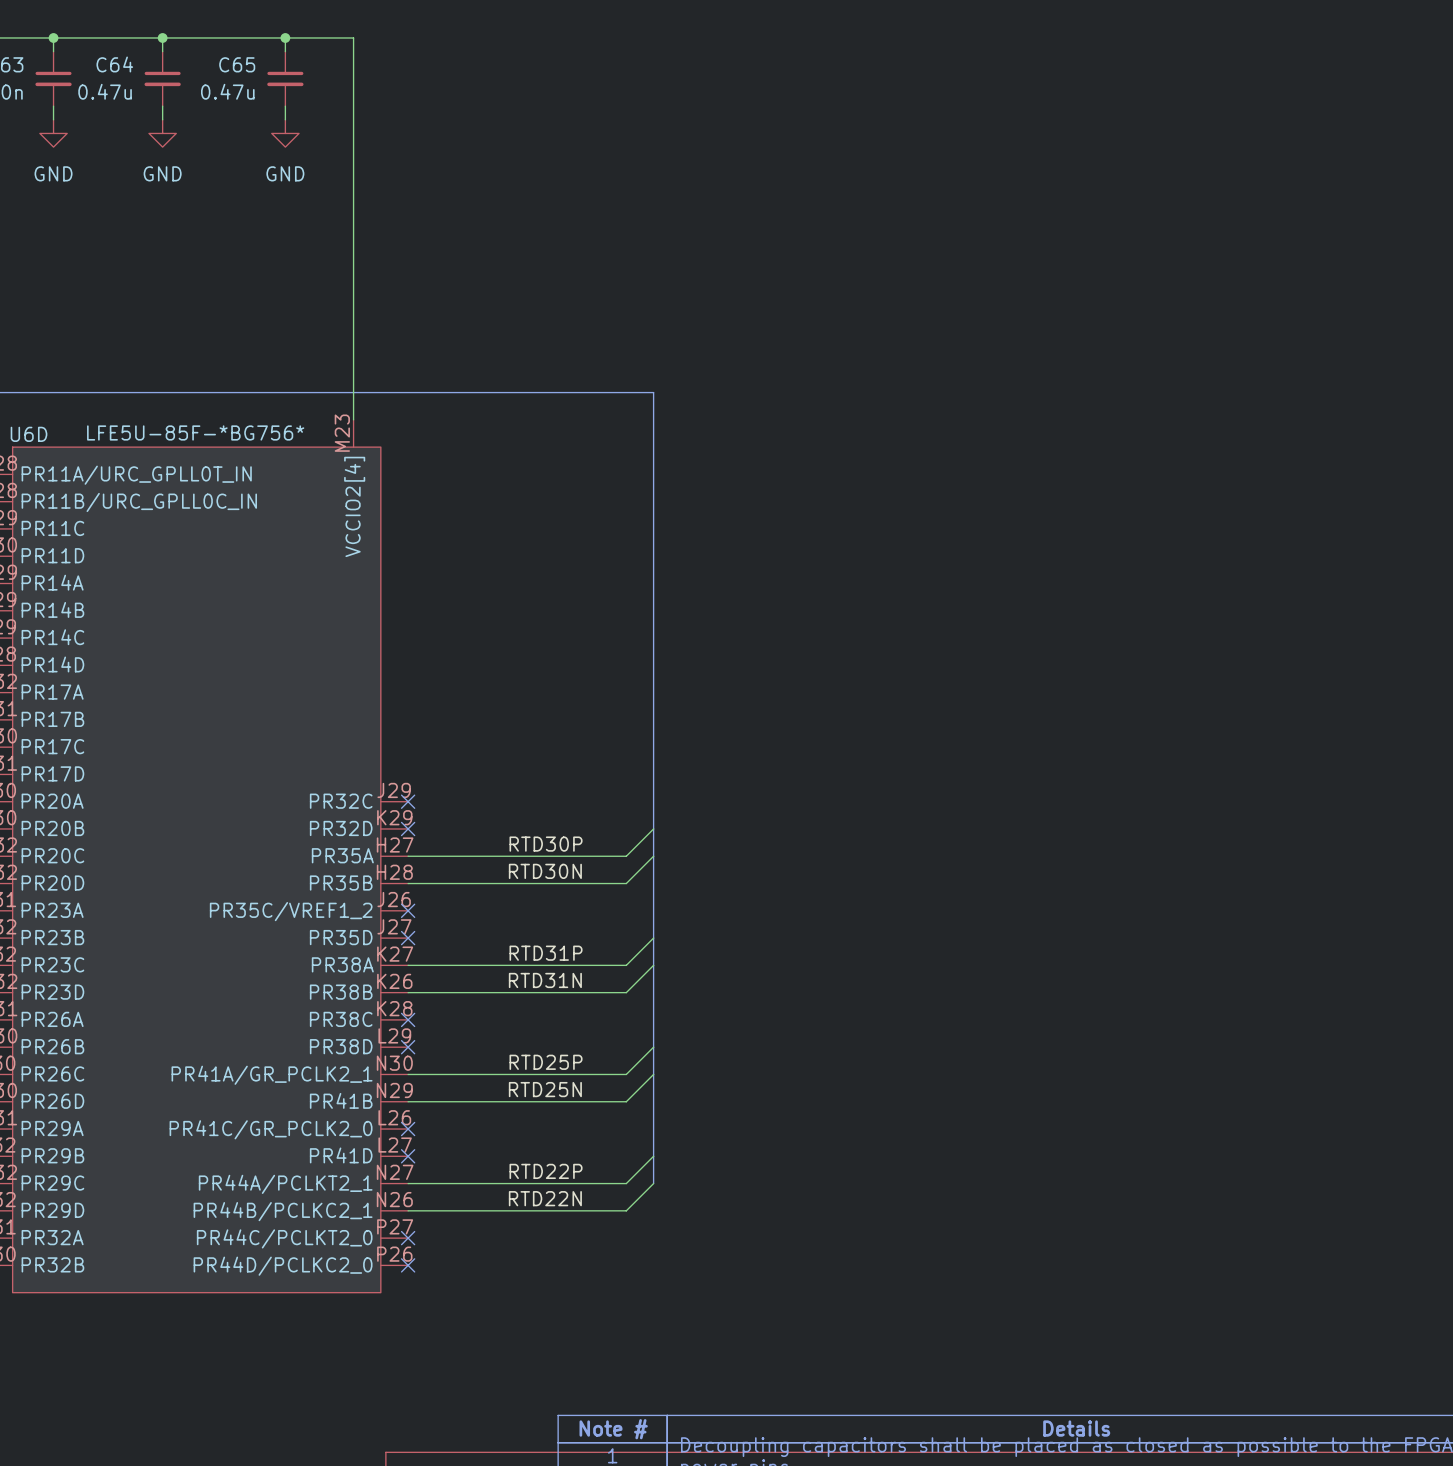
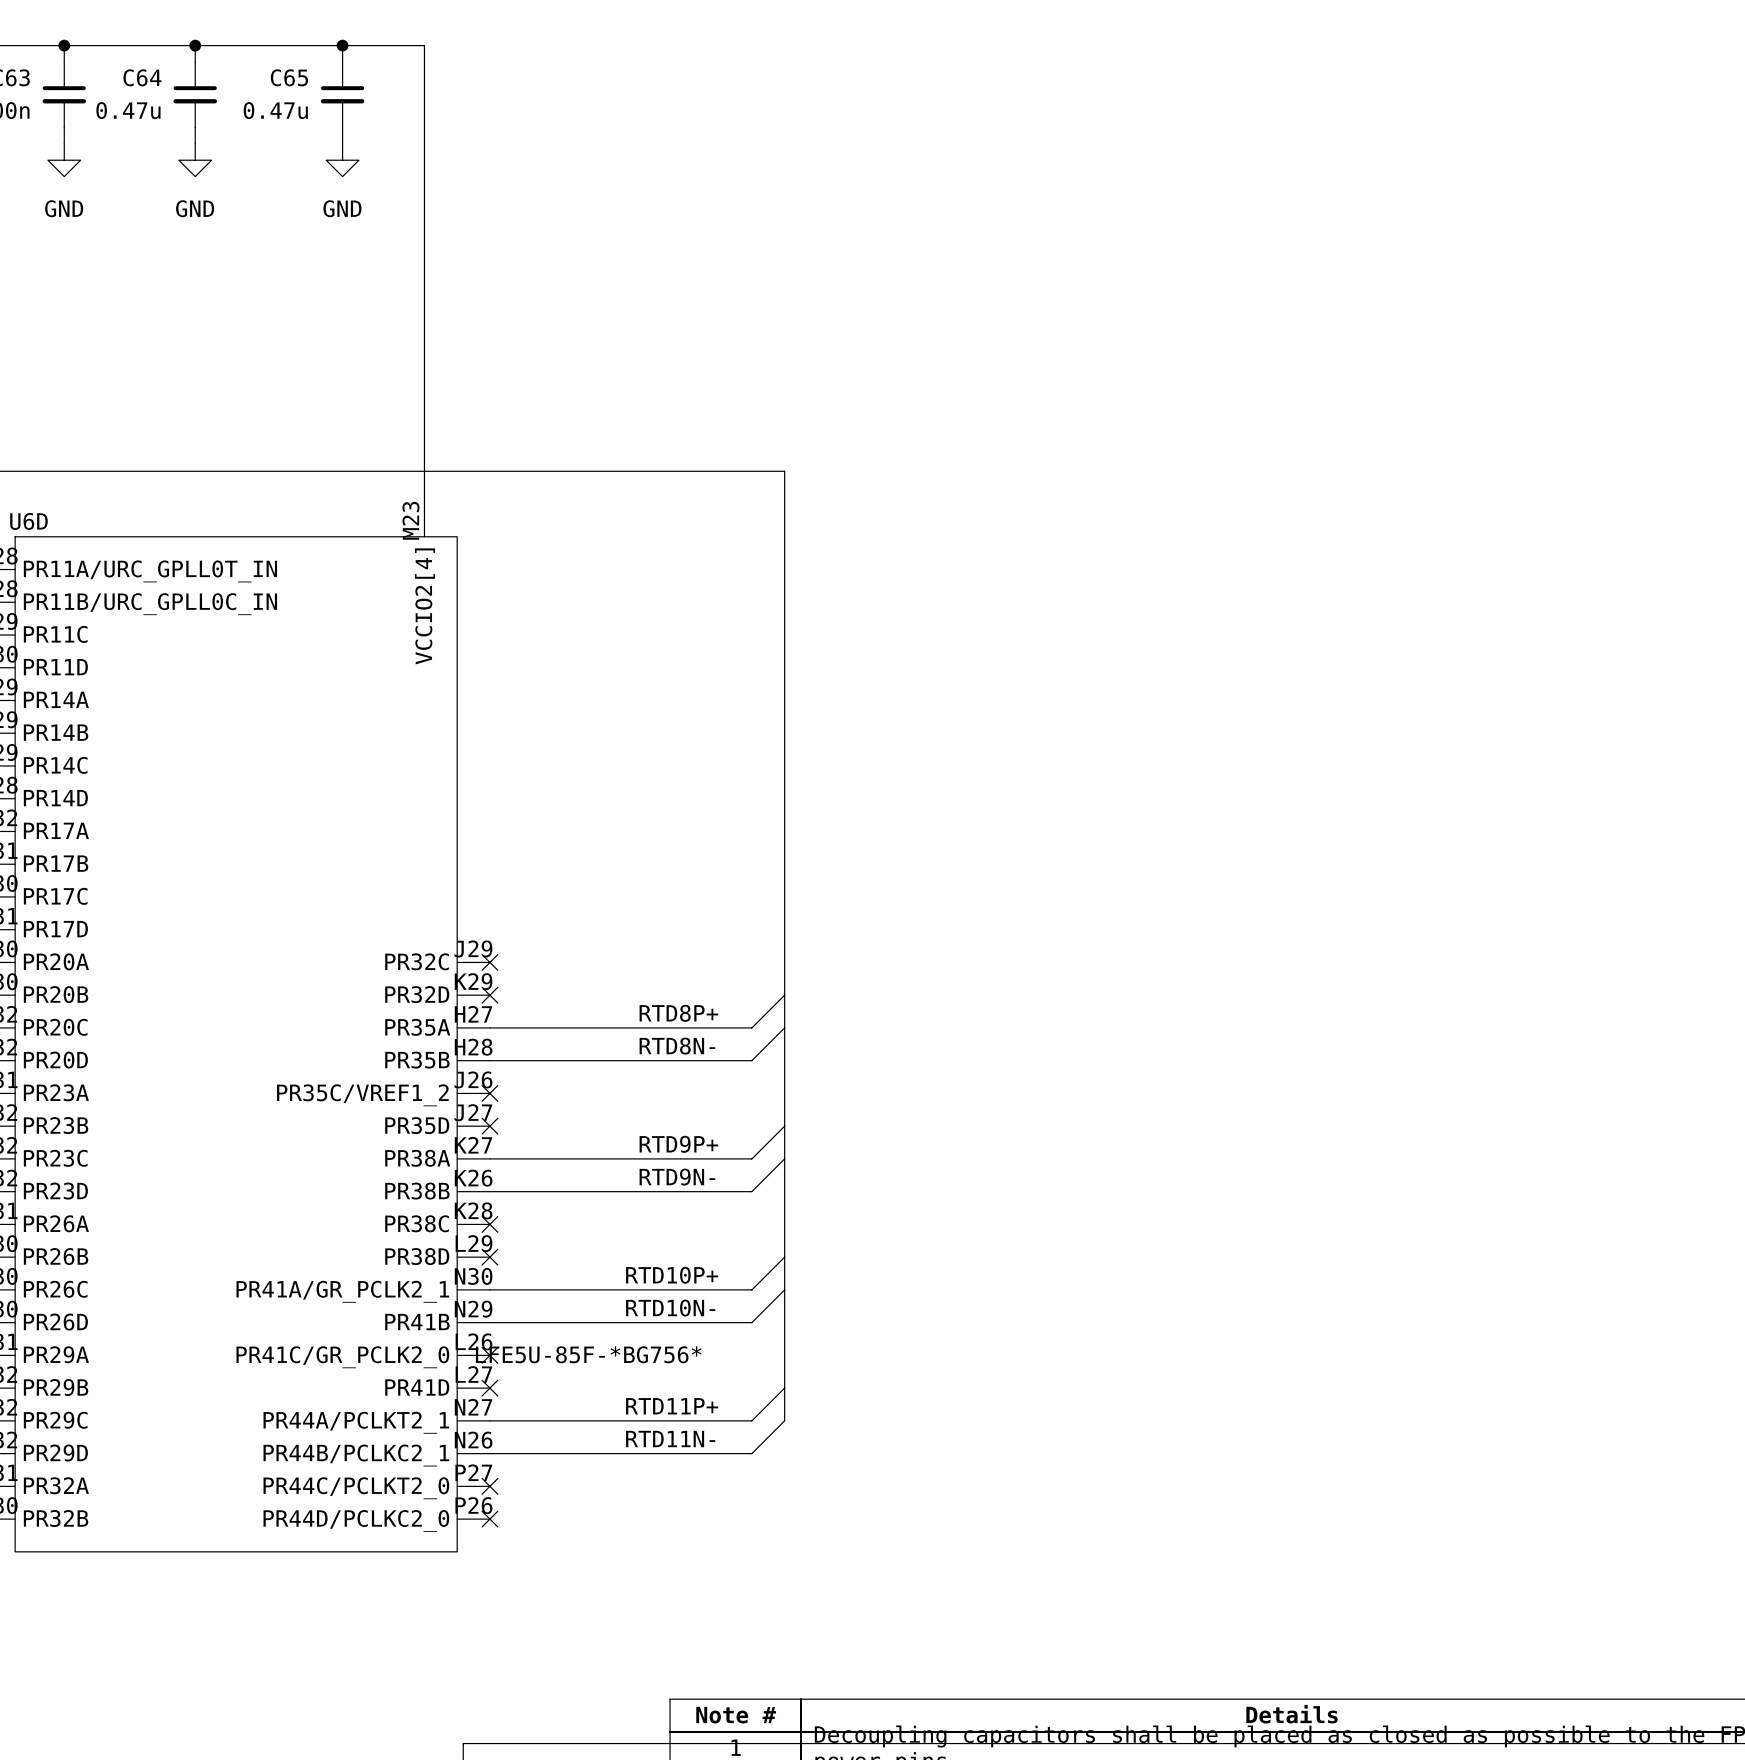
U6D value position: LFE5U-85F-*BG756* (195, 432) -> LFE5U-85F-*BG756* (588, 1354)
label: RTD30P (546, 844) -> RTD8P+ (678, 1013)
label: RTD30N (545, 871) -> RTD8N- (677, 1046)
label: RTD31P (546, 953) -> RTD9P+ (678, 1144)
label: RTD31N (545, 980) -> RTD9N- (677, 1177)
label: RTD25P (546, 1062) -> RTD10P+ (672, 1275)
label: RTD25N (545, 1089) -> RTD10N- (670, 1308)
label: RTD22P (546, 1171) -> RTD11P+ (672, 1406)
label: RTD22N (545, 1198) -> RTD11N- (670, 1439)

